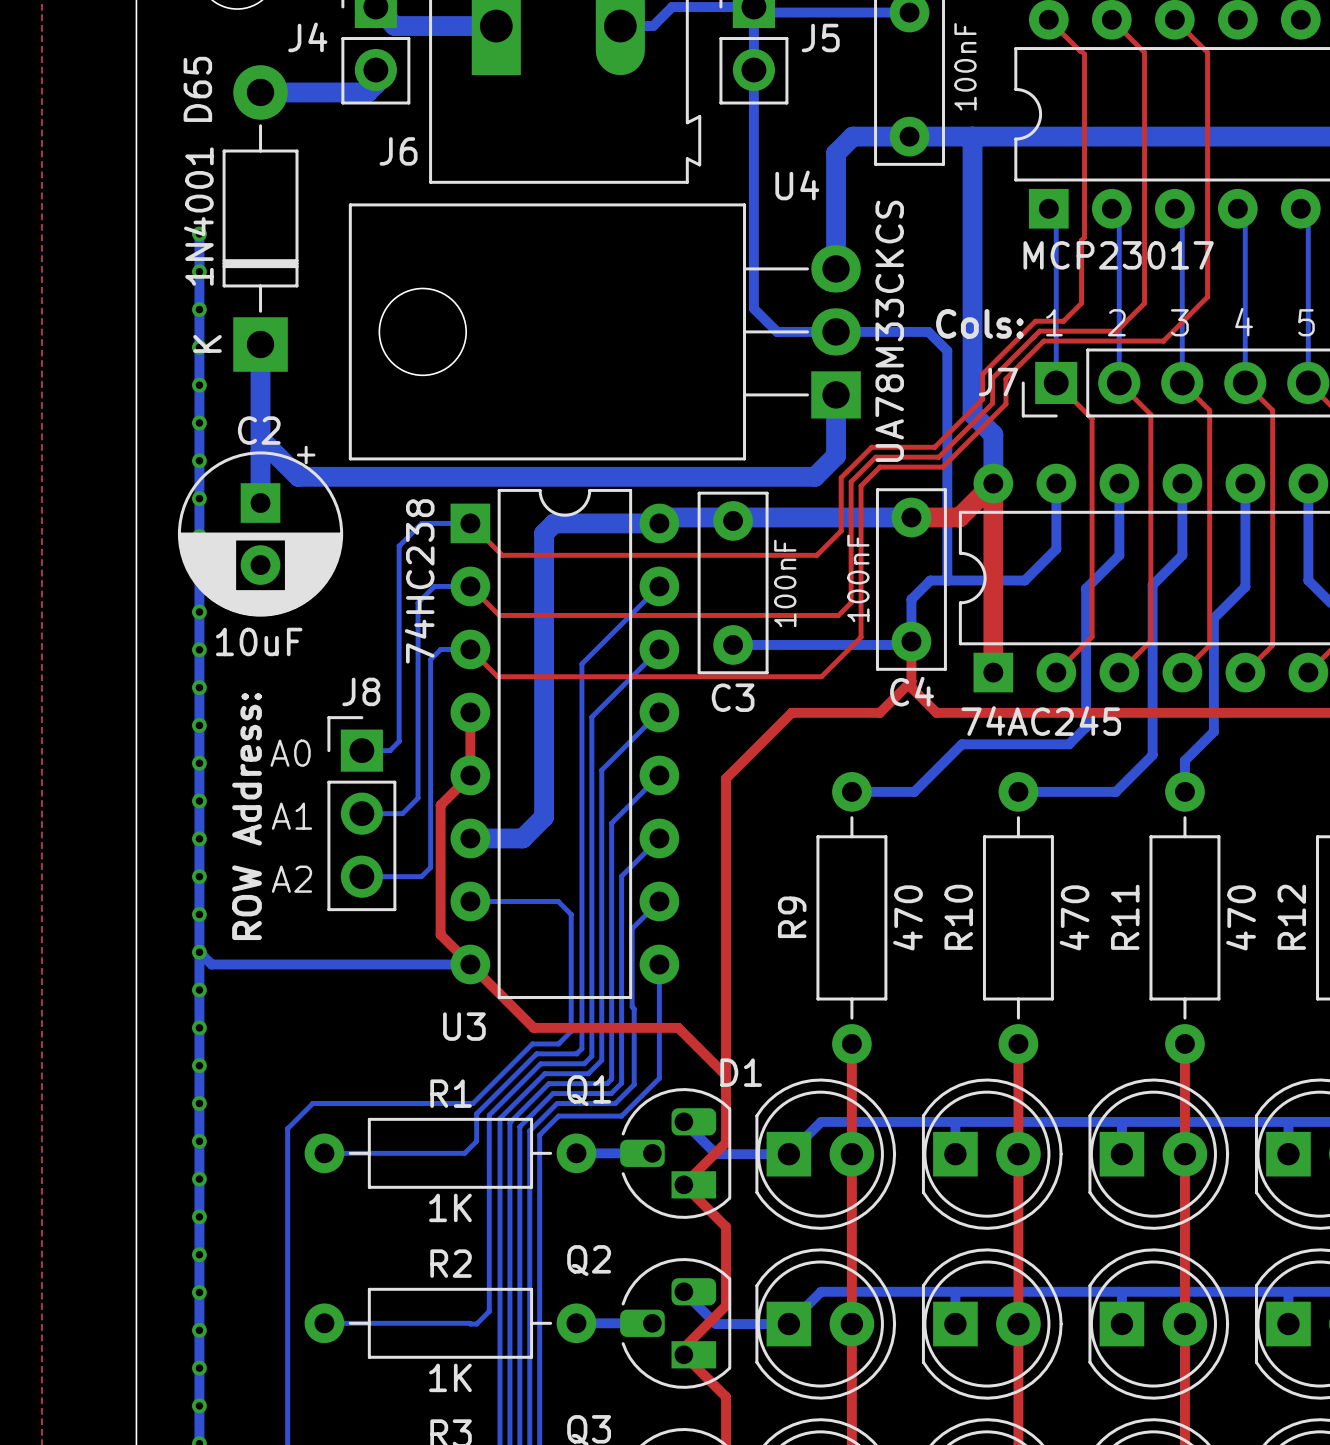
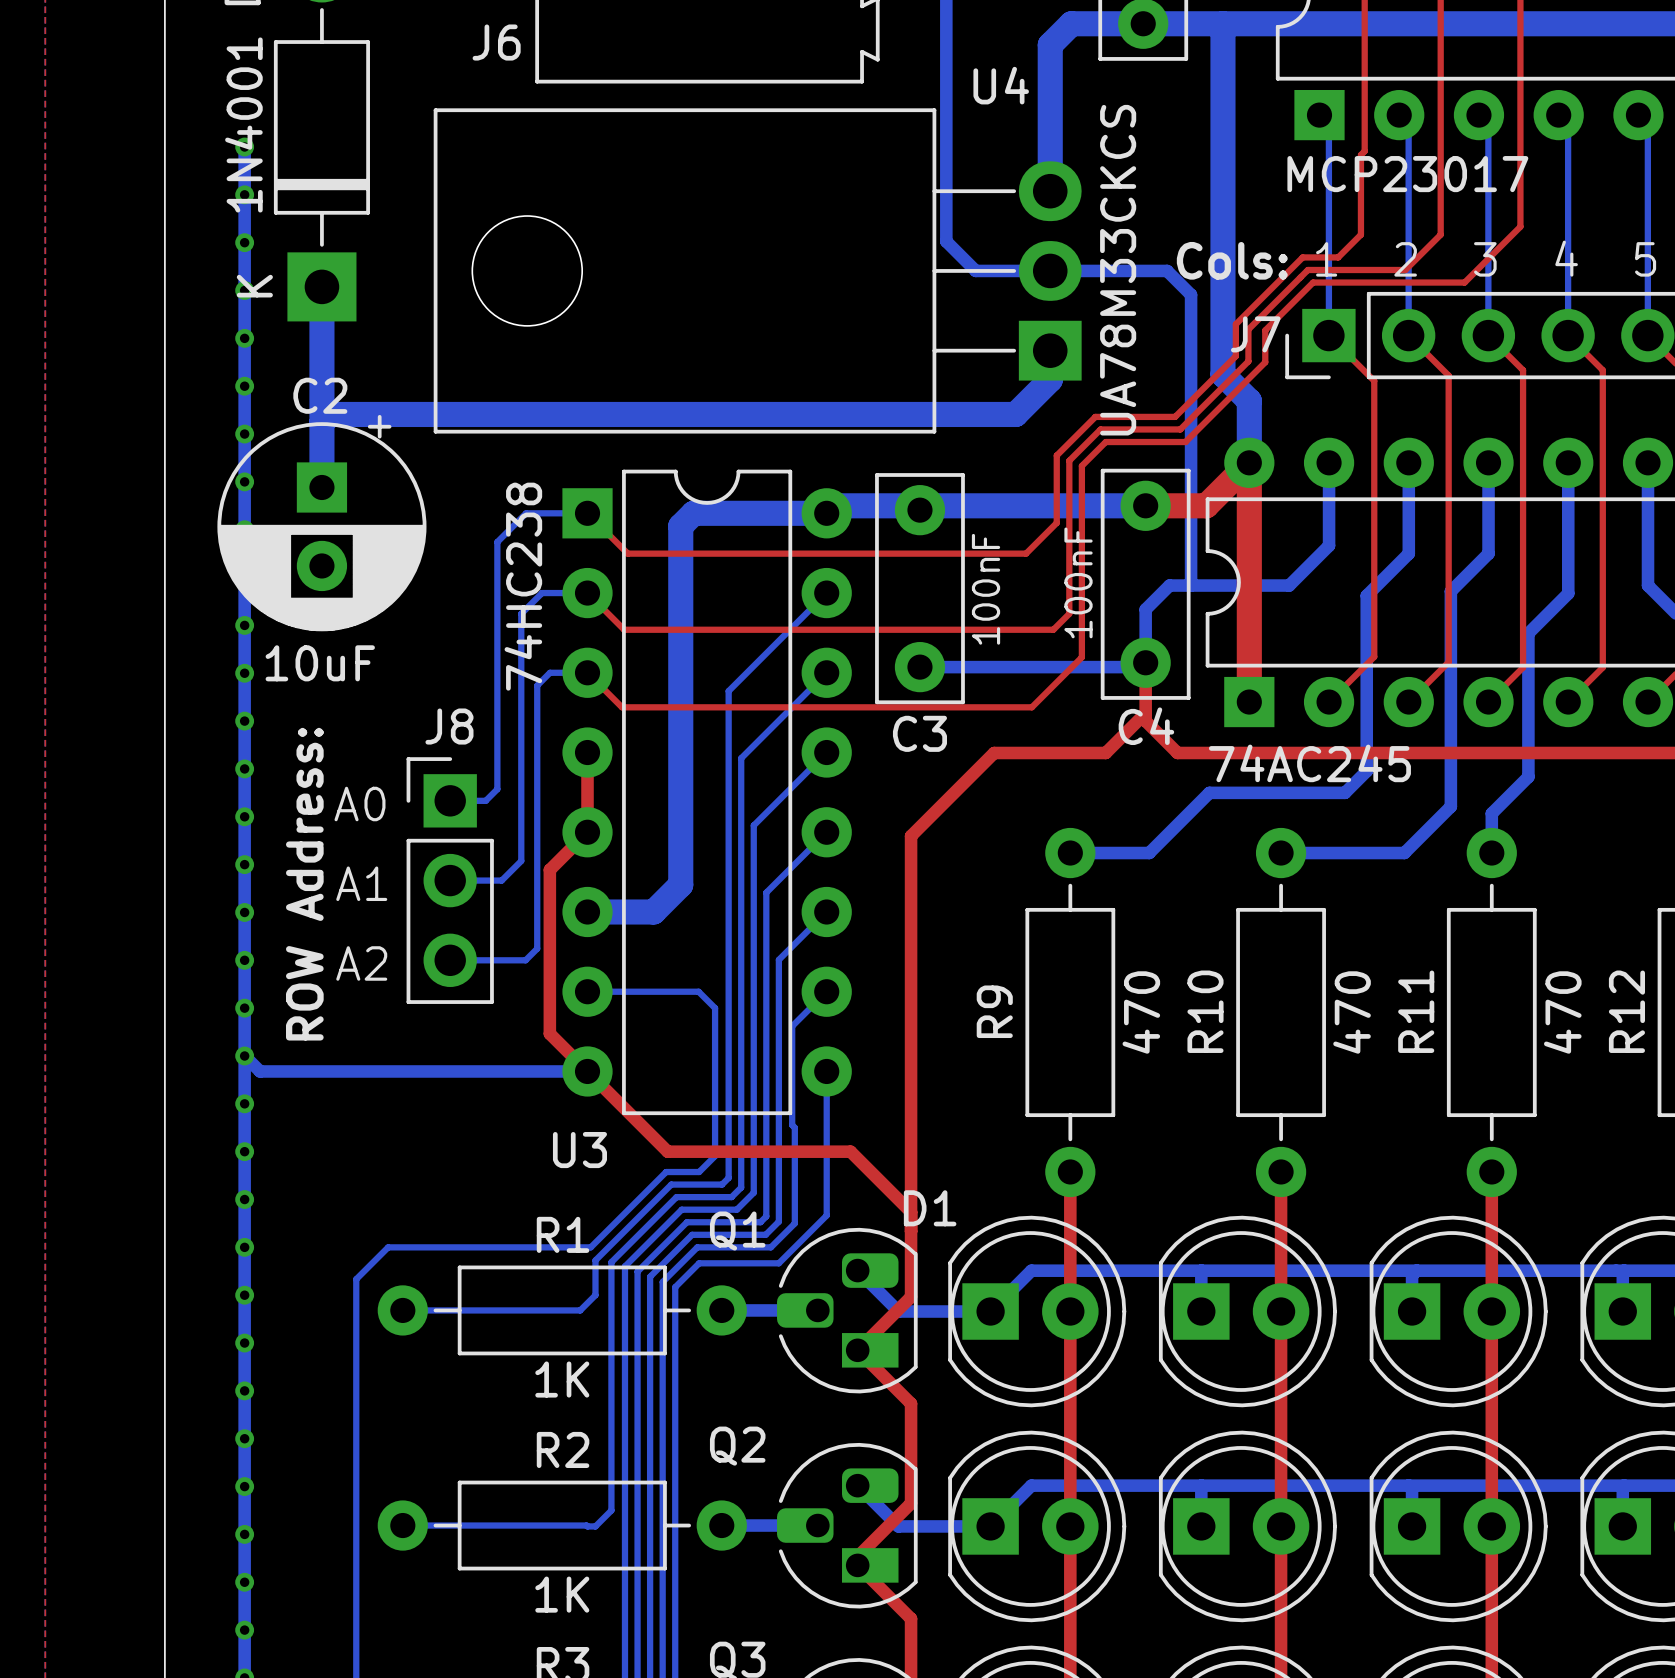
bottom track: (836, 417) (836, 455) (815, 476) (298, 476) (266, 445) -> (1050, 379) (1015, 414) (329, 414)

